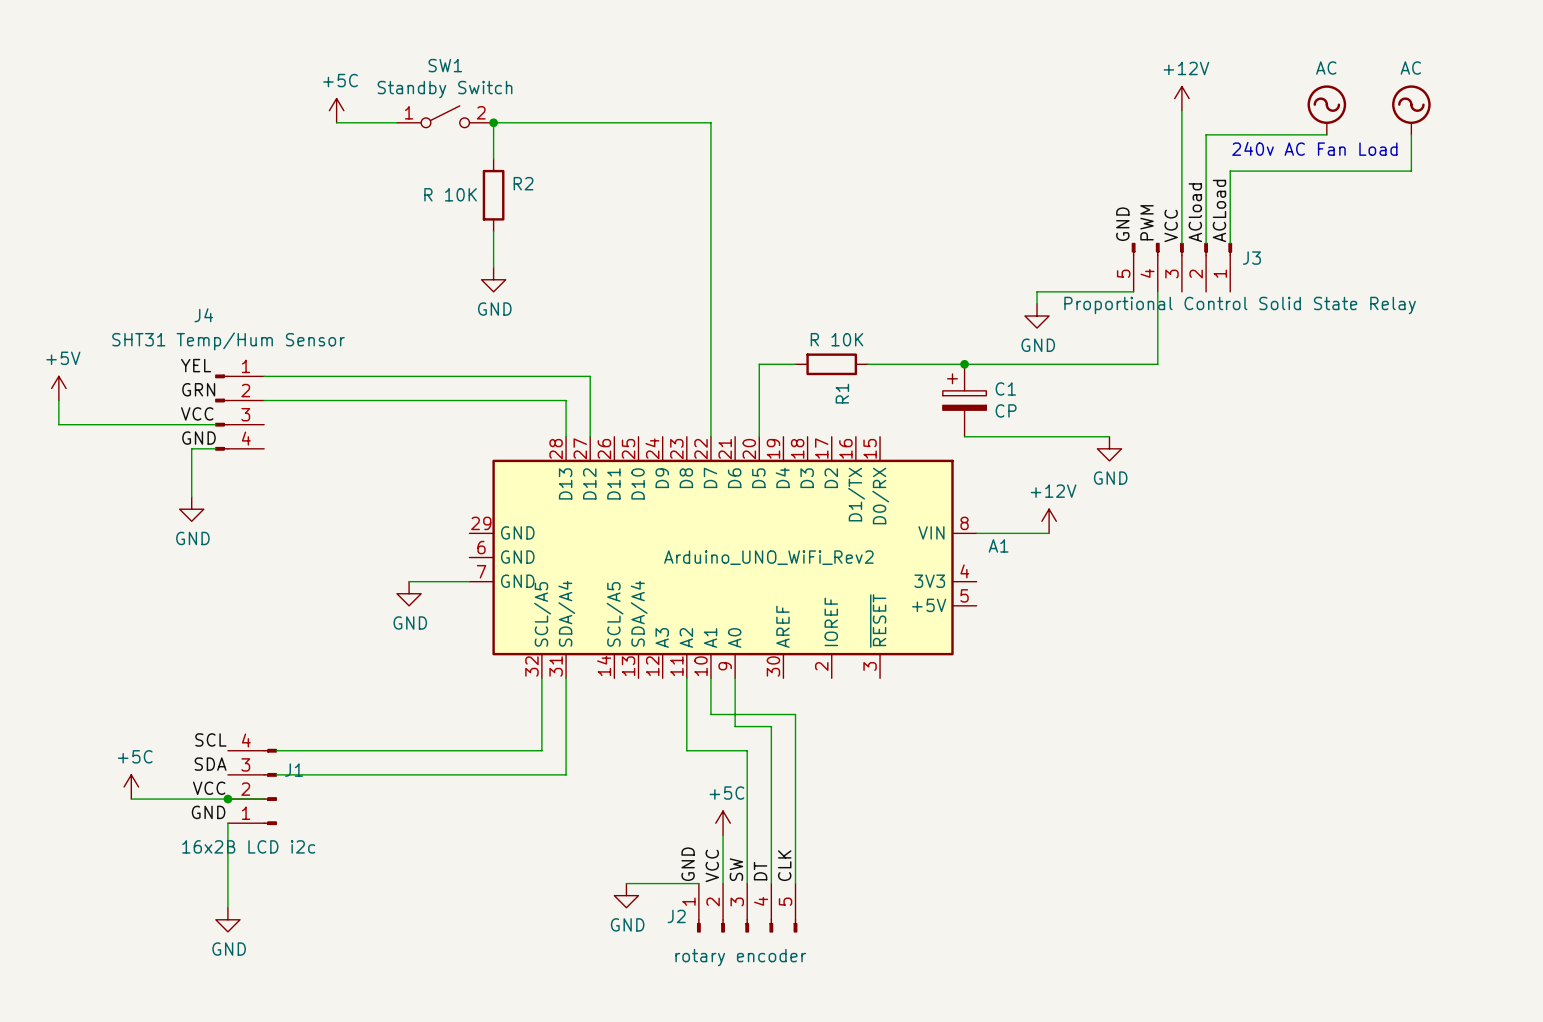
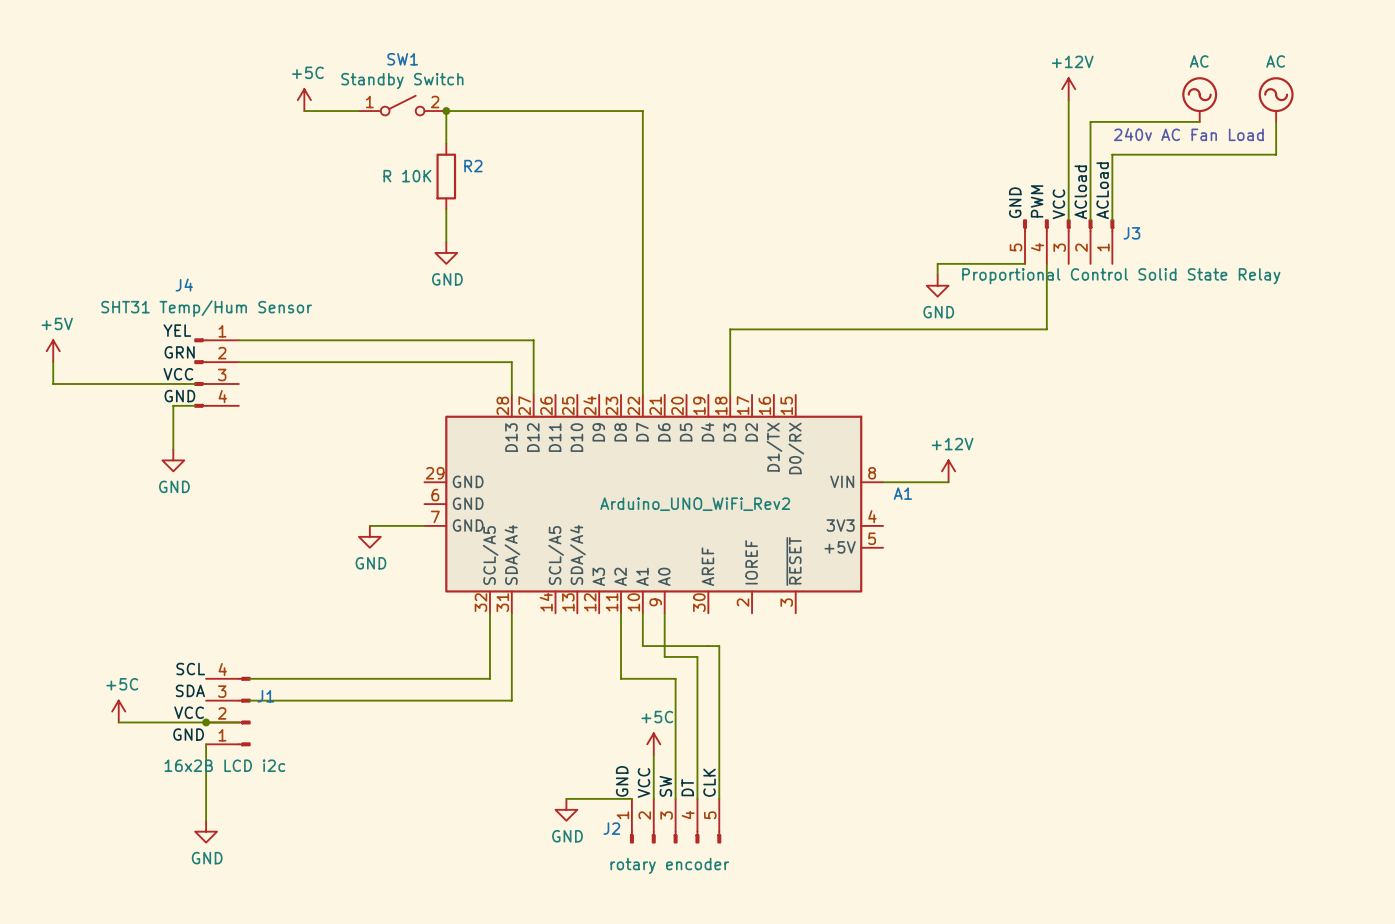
wire: (795, 364) (759, 364) (759, 436) -> none
R1: R 10K (831, 364) -> none
wire: none -> (784, 329) (730, 329) (730, 394)
junction: (964, 364) -> none
C1: CP (964, 400) -> none
wire: (964, 436) (1109, 436) -> none
power symbol: GND (1109, 448) -> none

